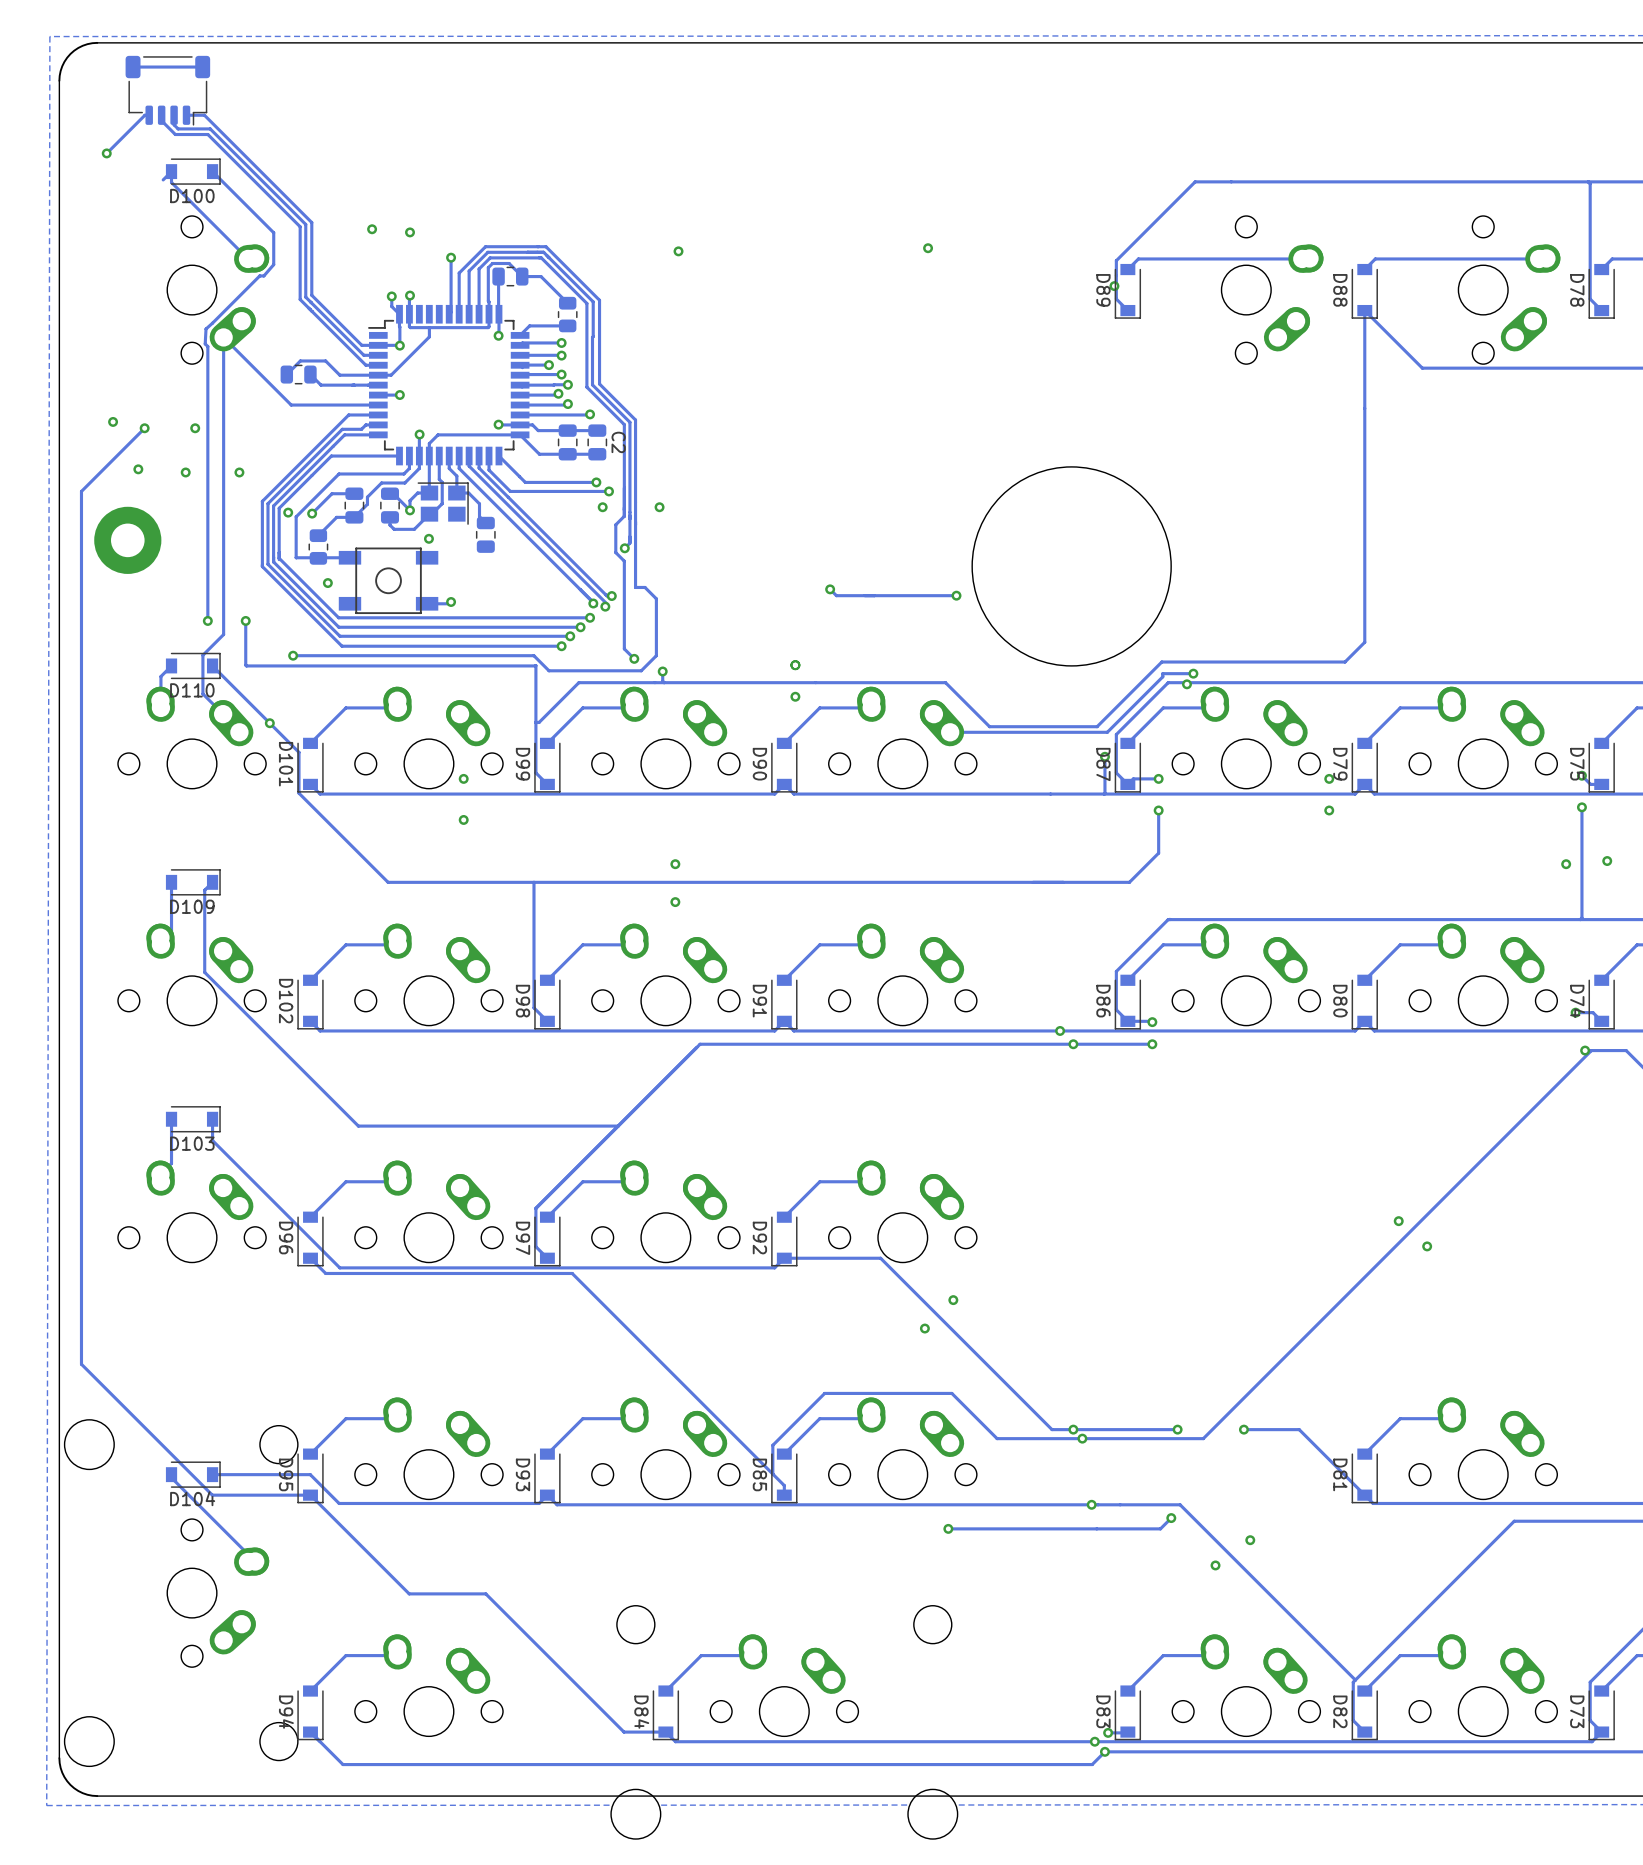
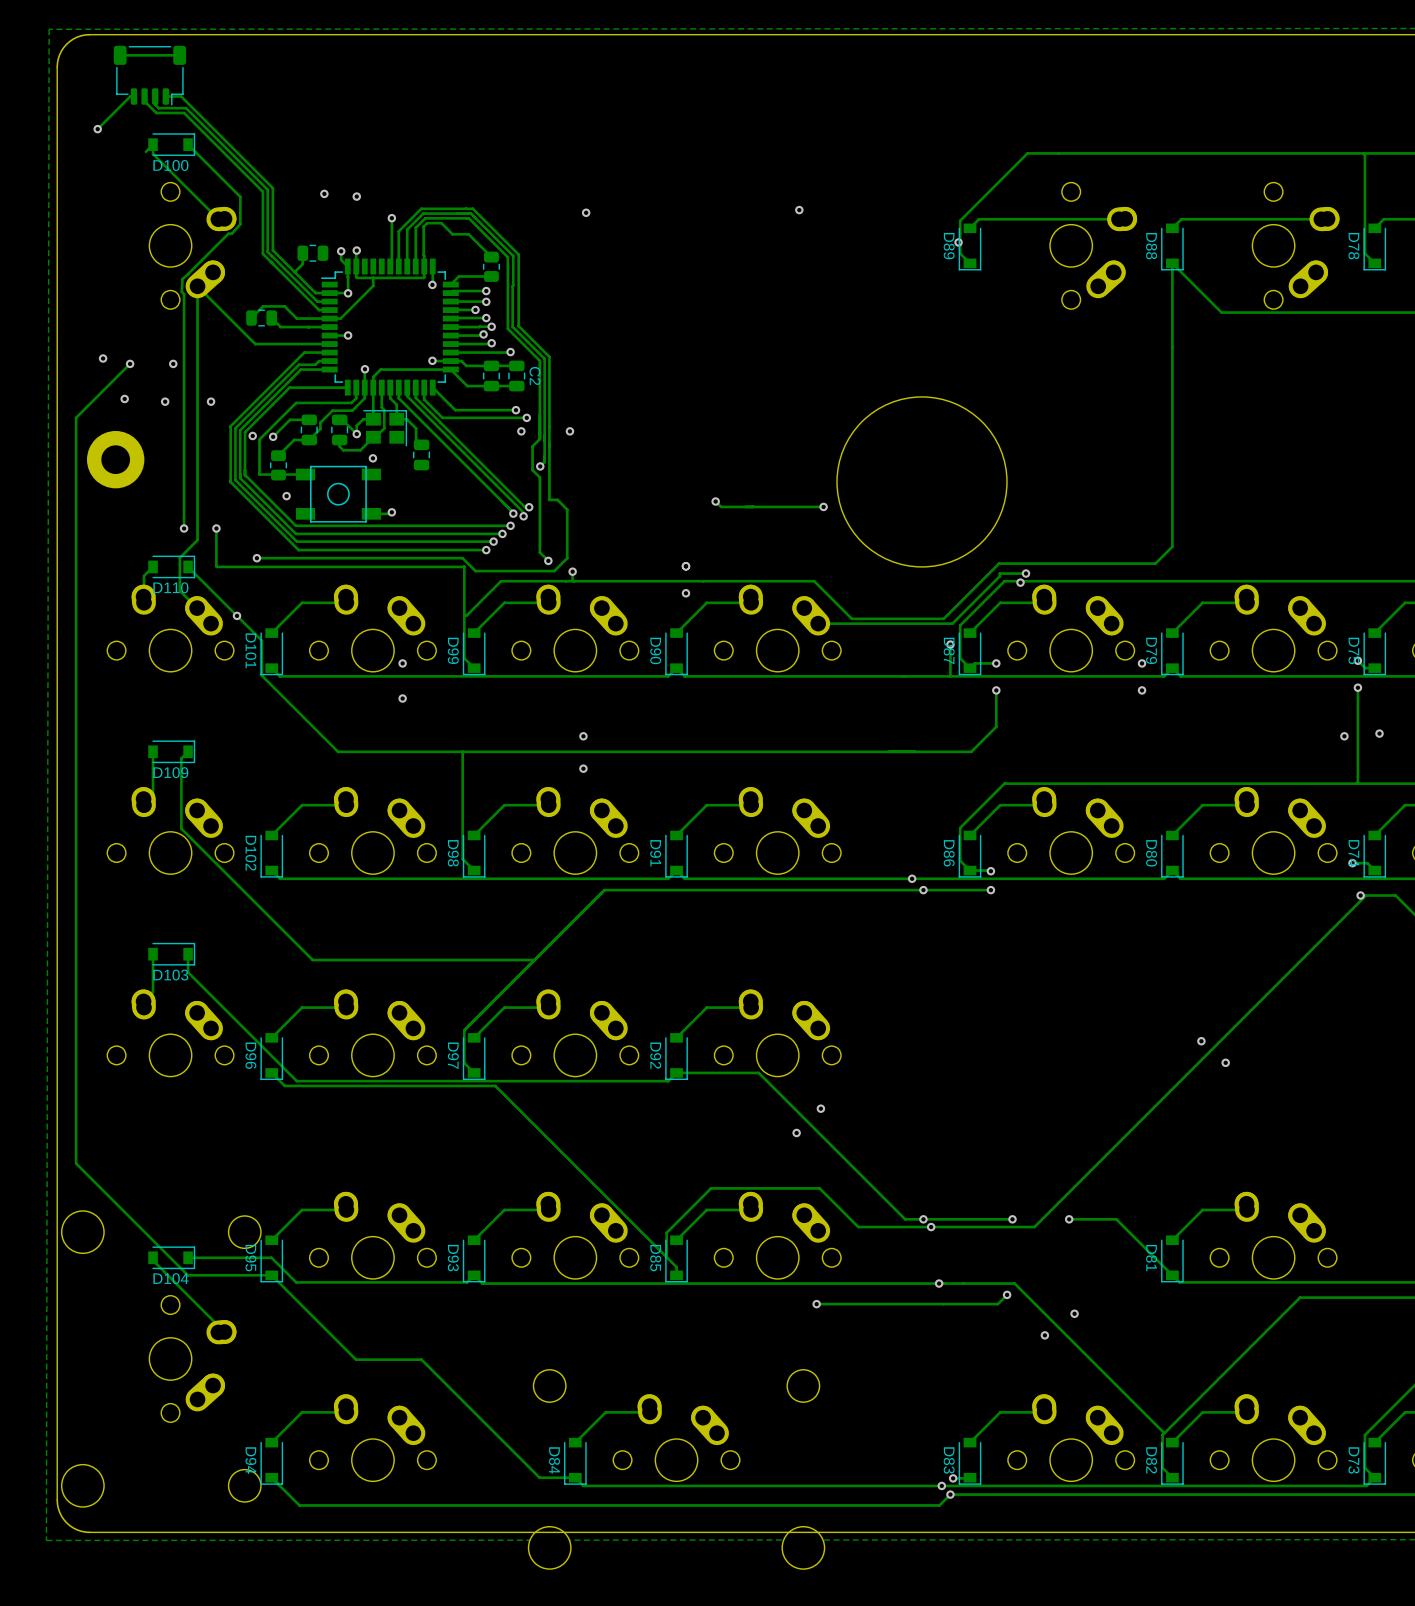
track: (498, 276) (498, 313) -> none
part position: (510, 276) -> (312, 253)
track: none -> (302, 253) (302, 264) (294, 272)

